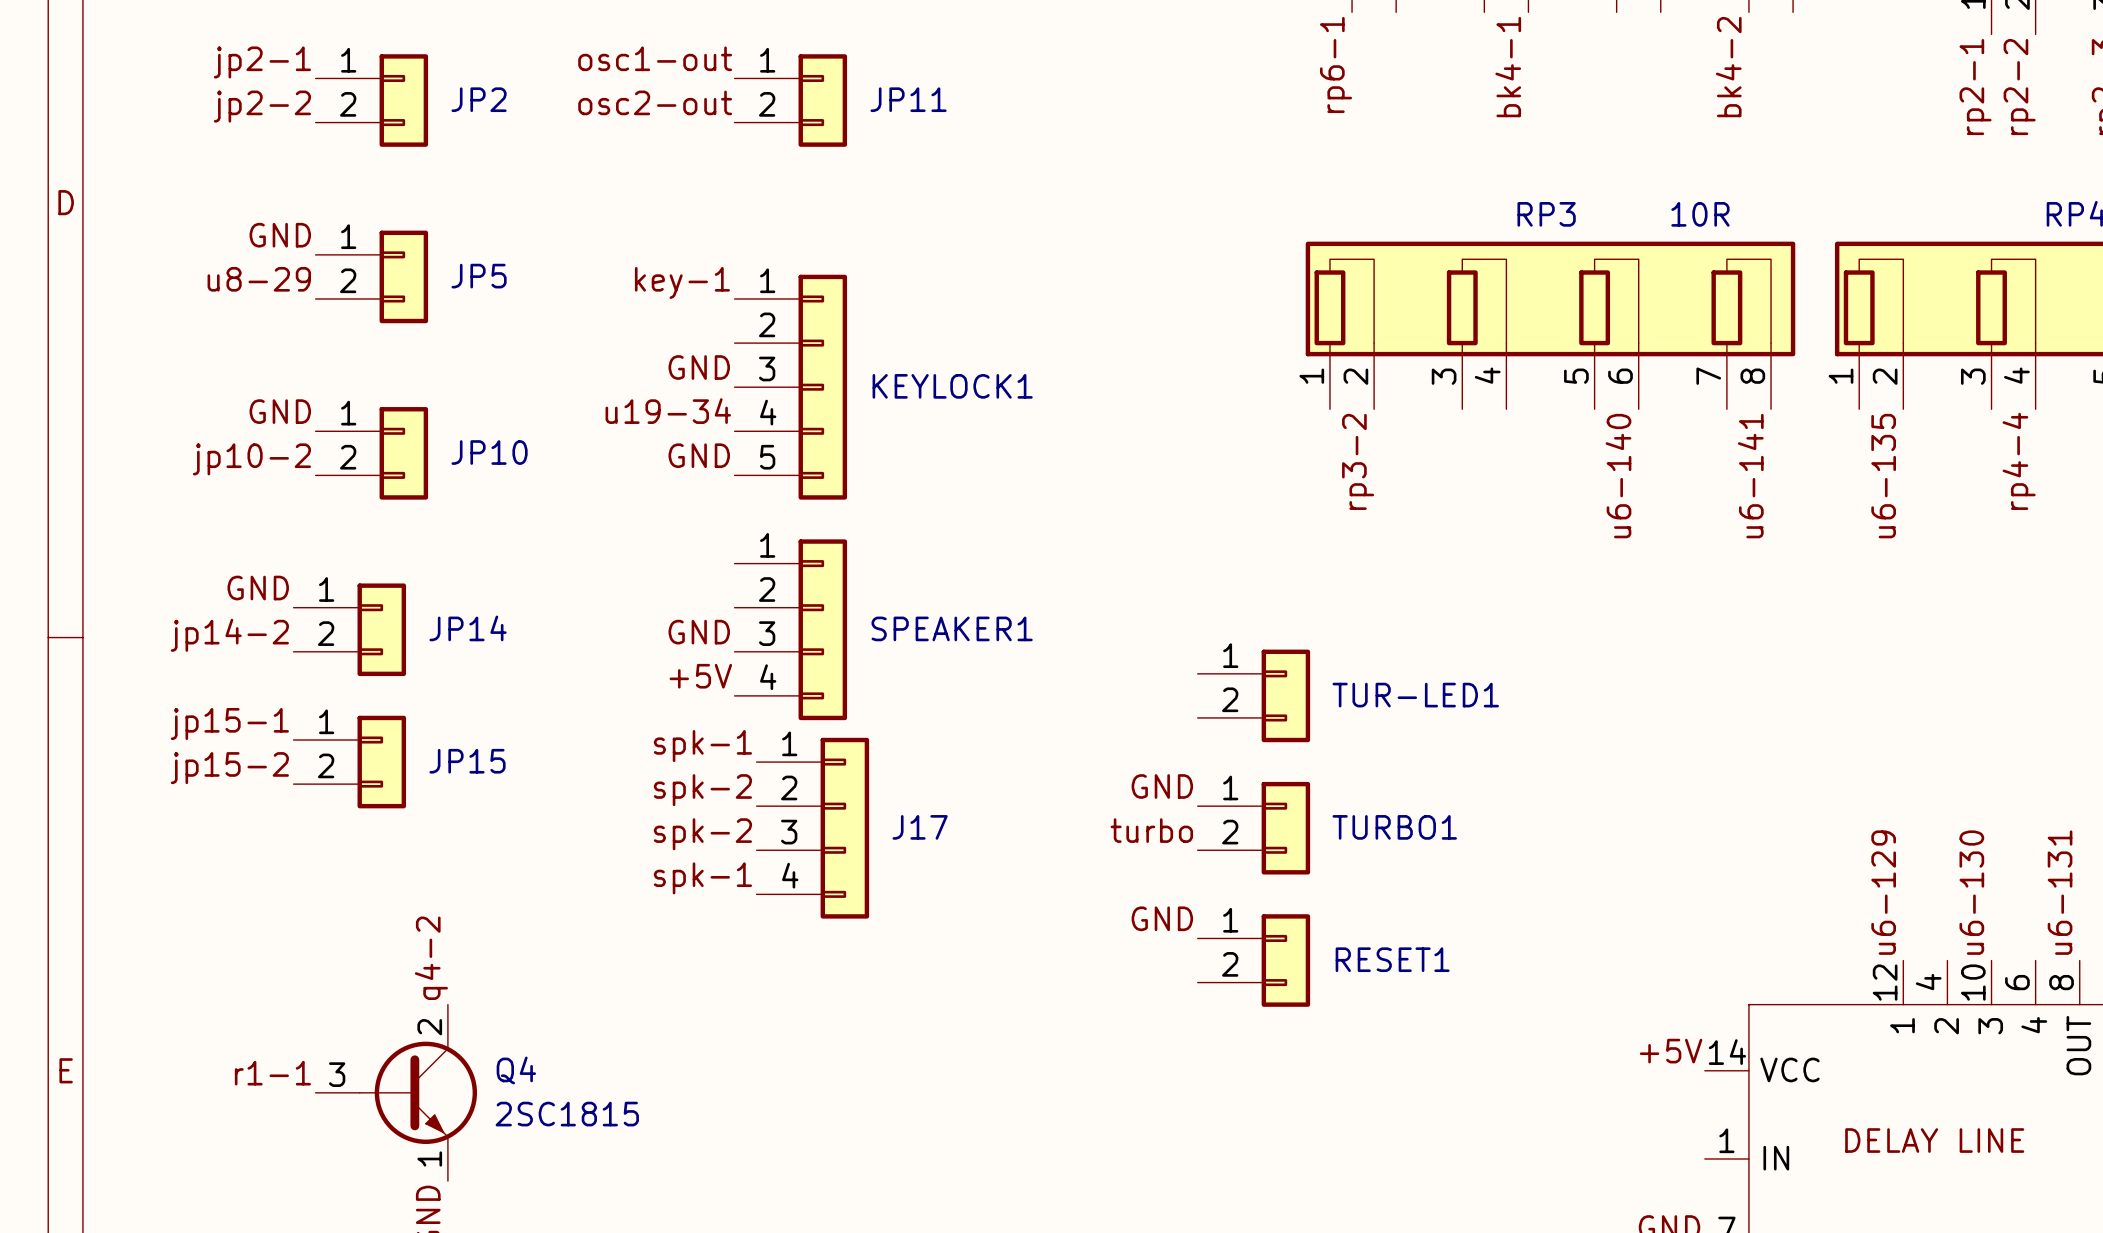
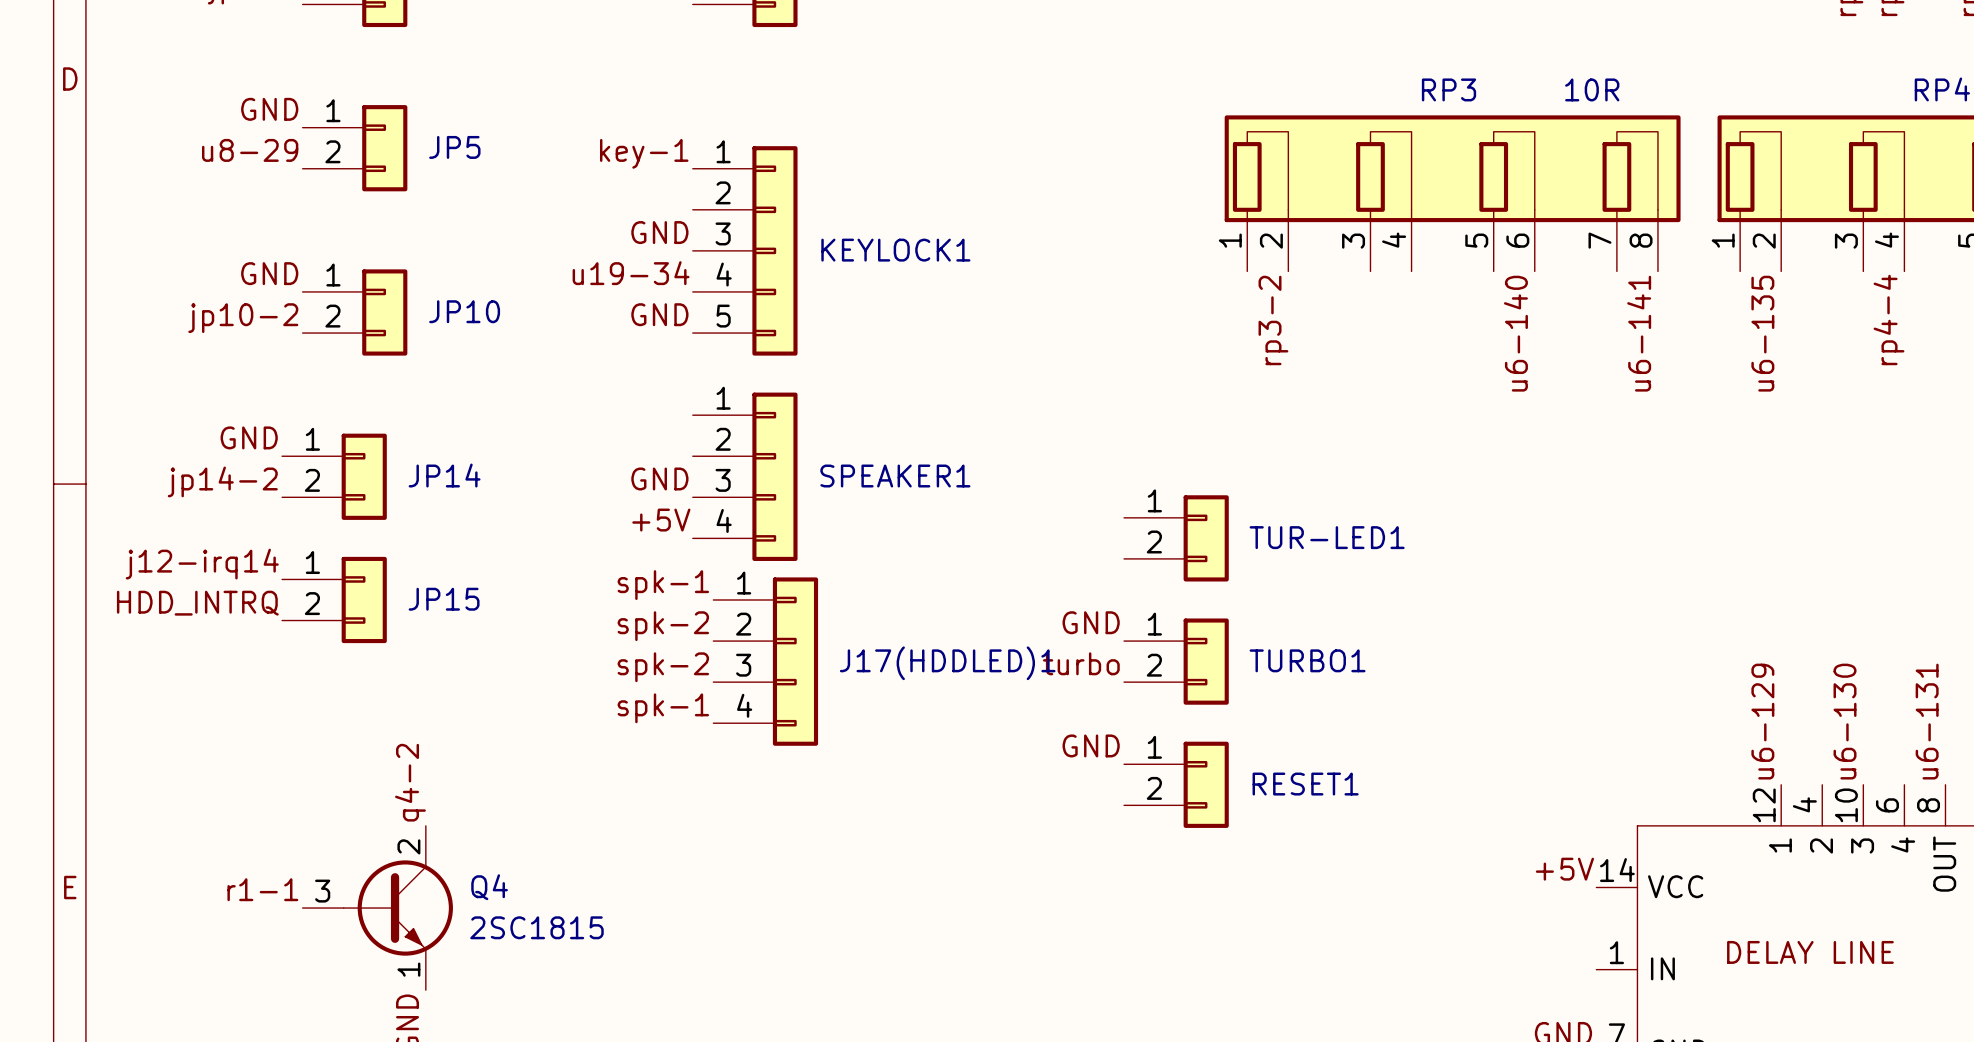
label: jp15-1 (229, 724) -> j12-irq14 (202, 564)
label: jp15-2 (229, 768) -> HDD_INTRQ (197, 603)
J17 name: J17 (920, 827) -> J17(HDDLED)1 (947, 663)

